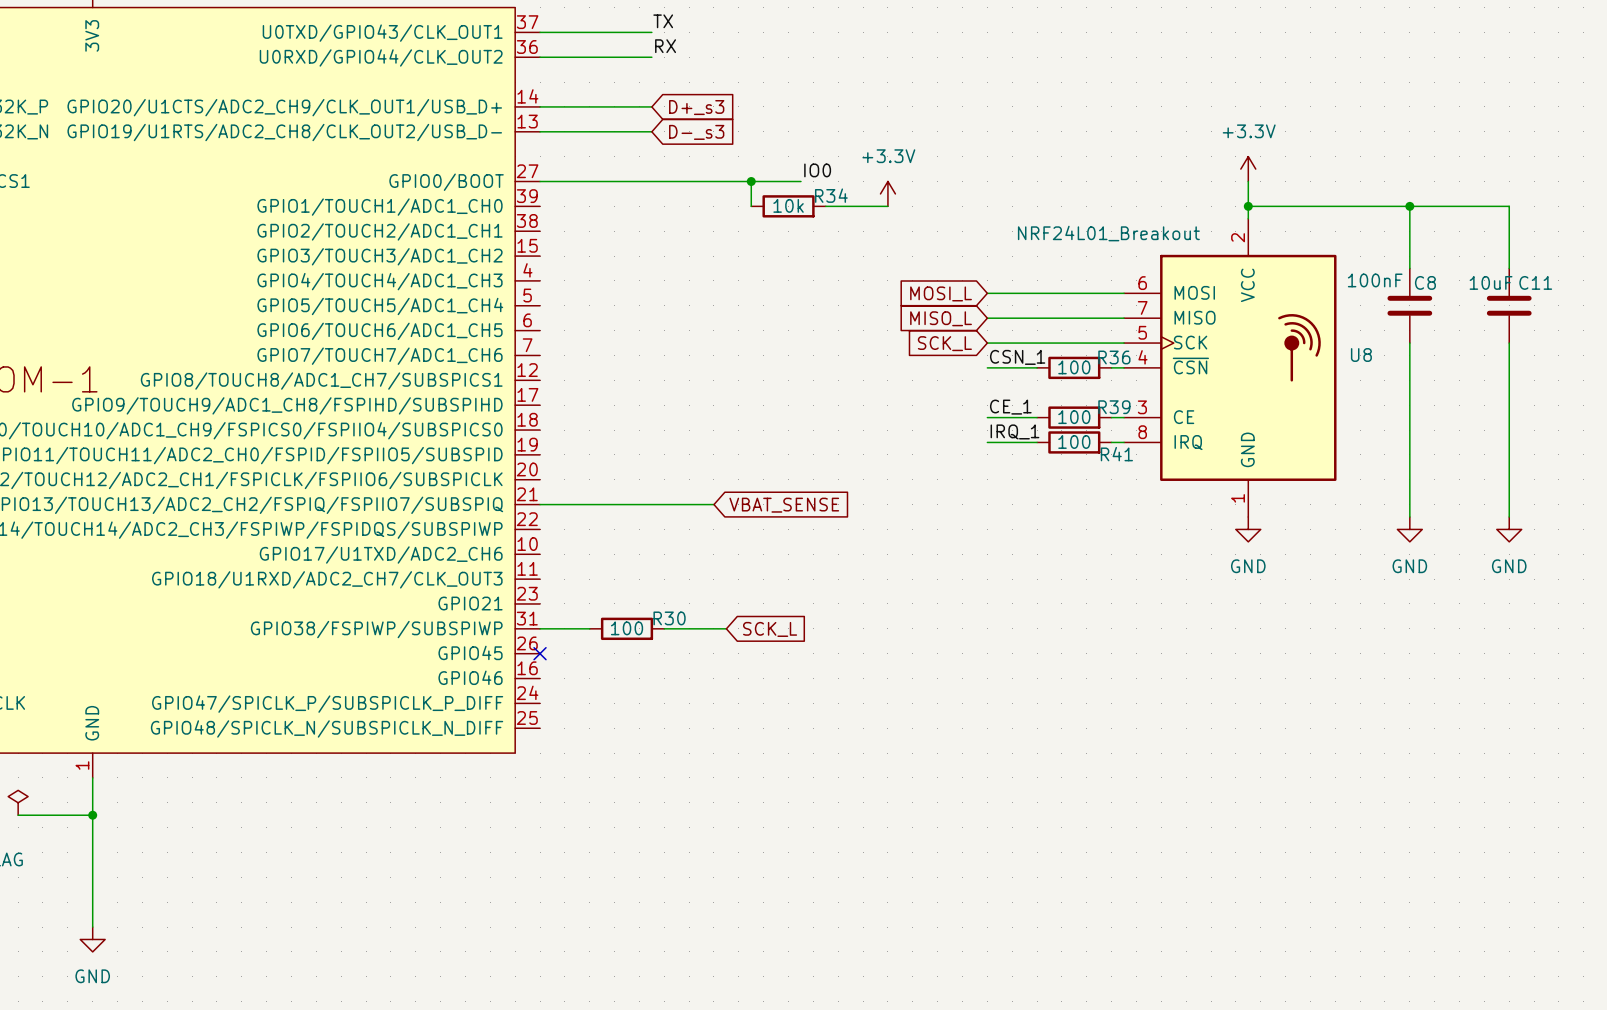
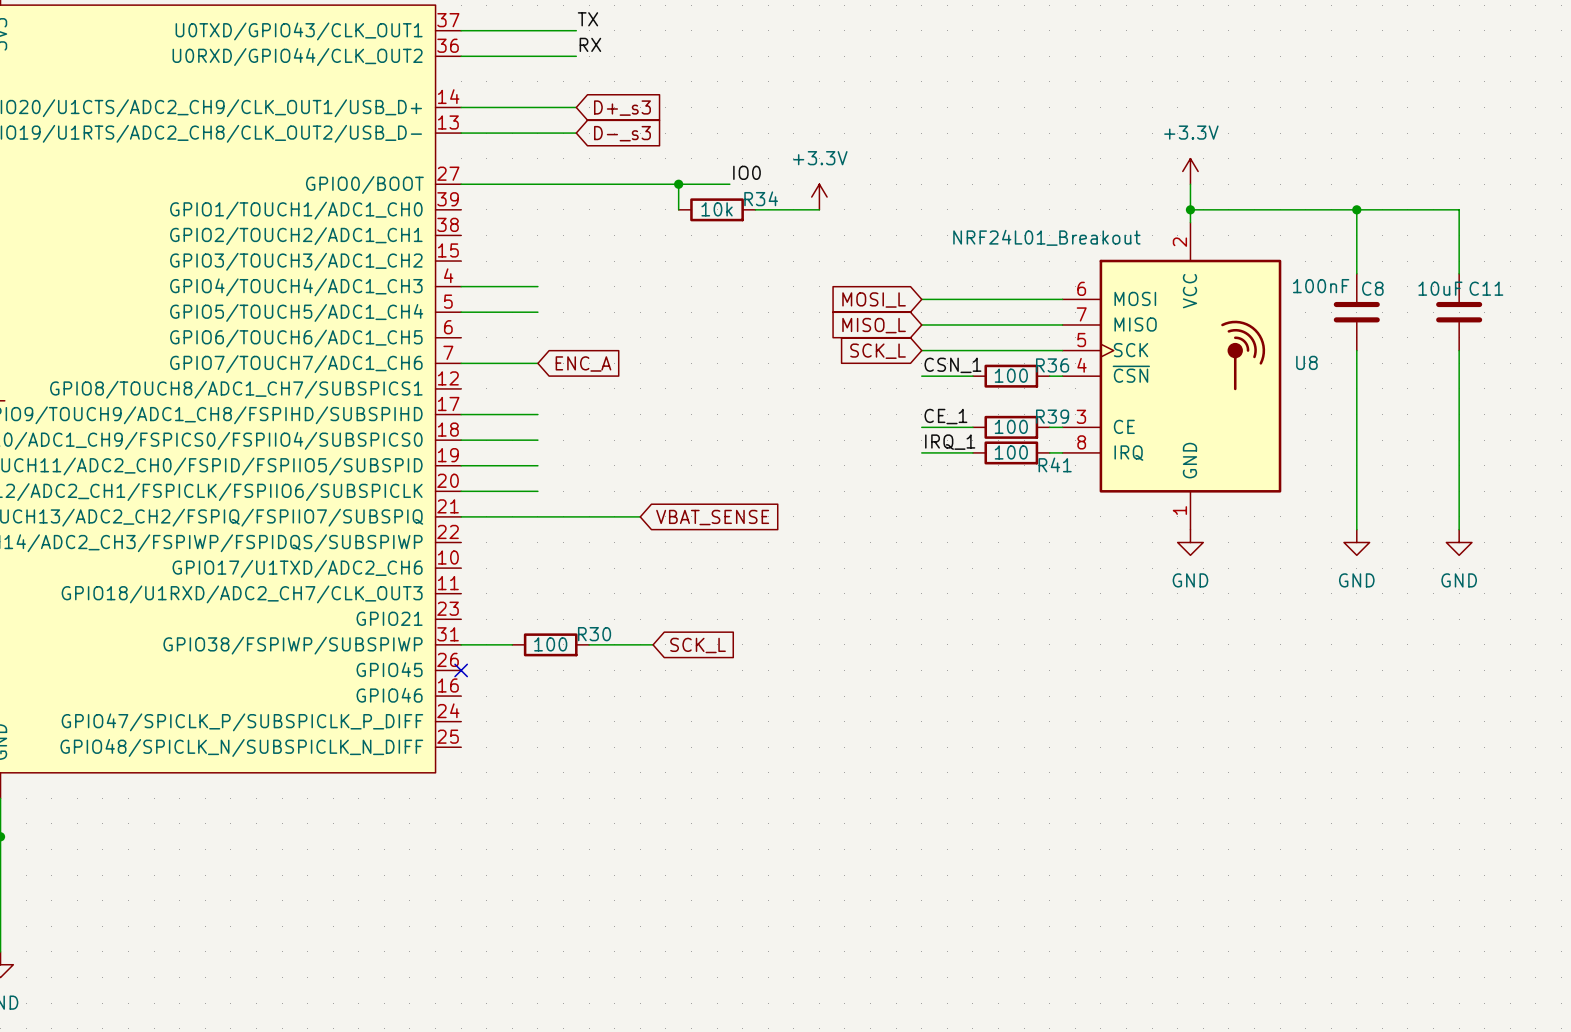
wire: none -> (461, 286) (537, 286)
wire: none -> (461, 312) (537, 312)
wire: none -> (461, 363) (537, 363)
global label: none -> ENC_A (583, 363)
wire: none -> (461, 414) (537, 414)
wire: none -> (461, 440) (537, 440)
wire: none -> (461, 465) (537, 465)
wire: none -> (461, 491) (537, 491)

